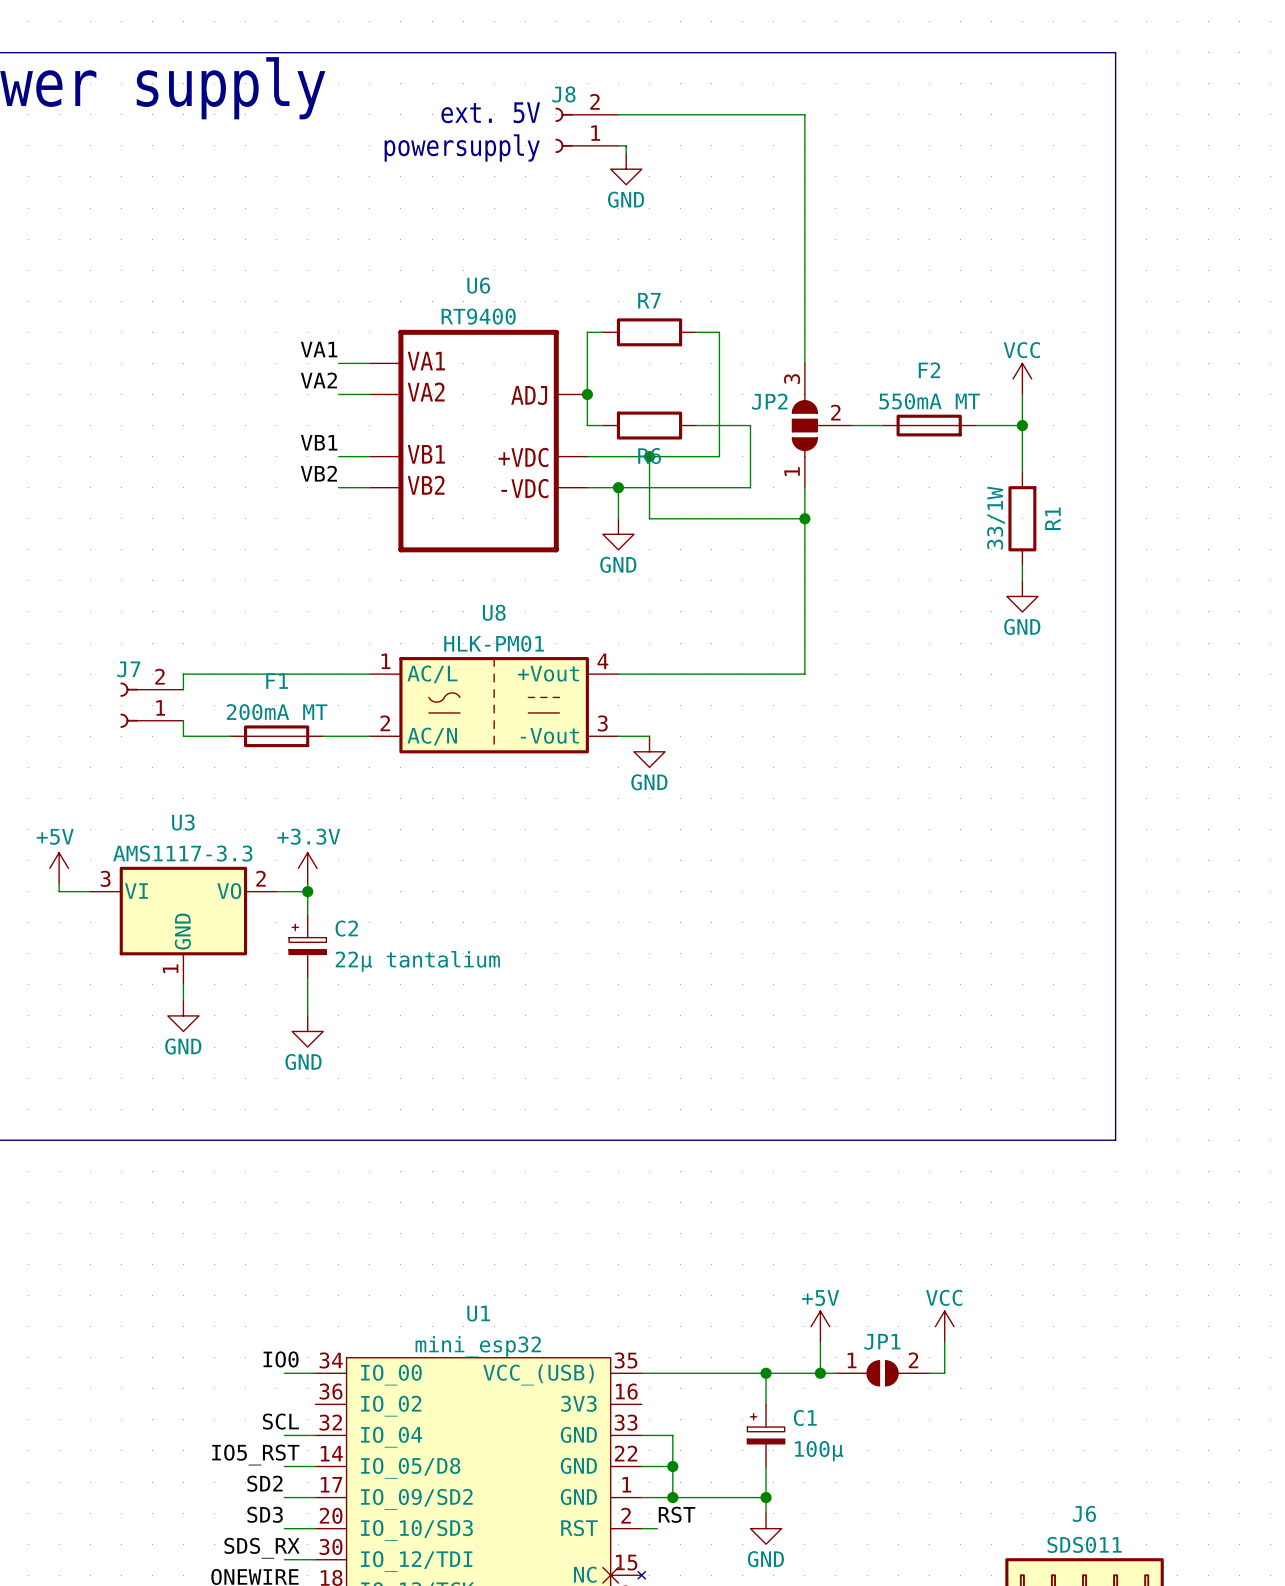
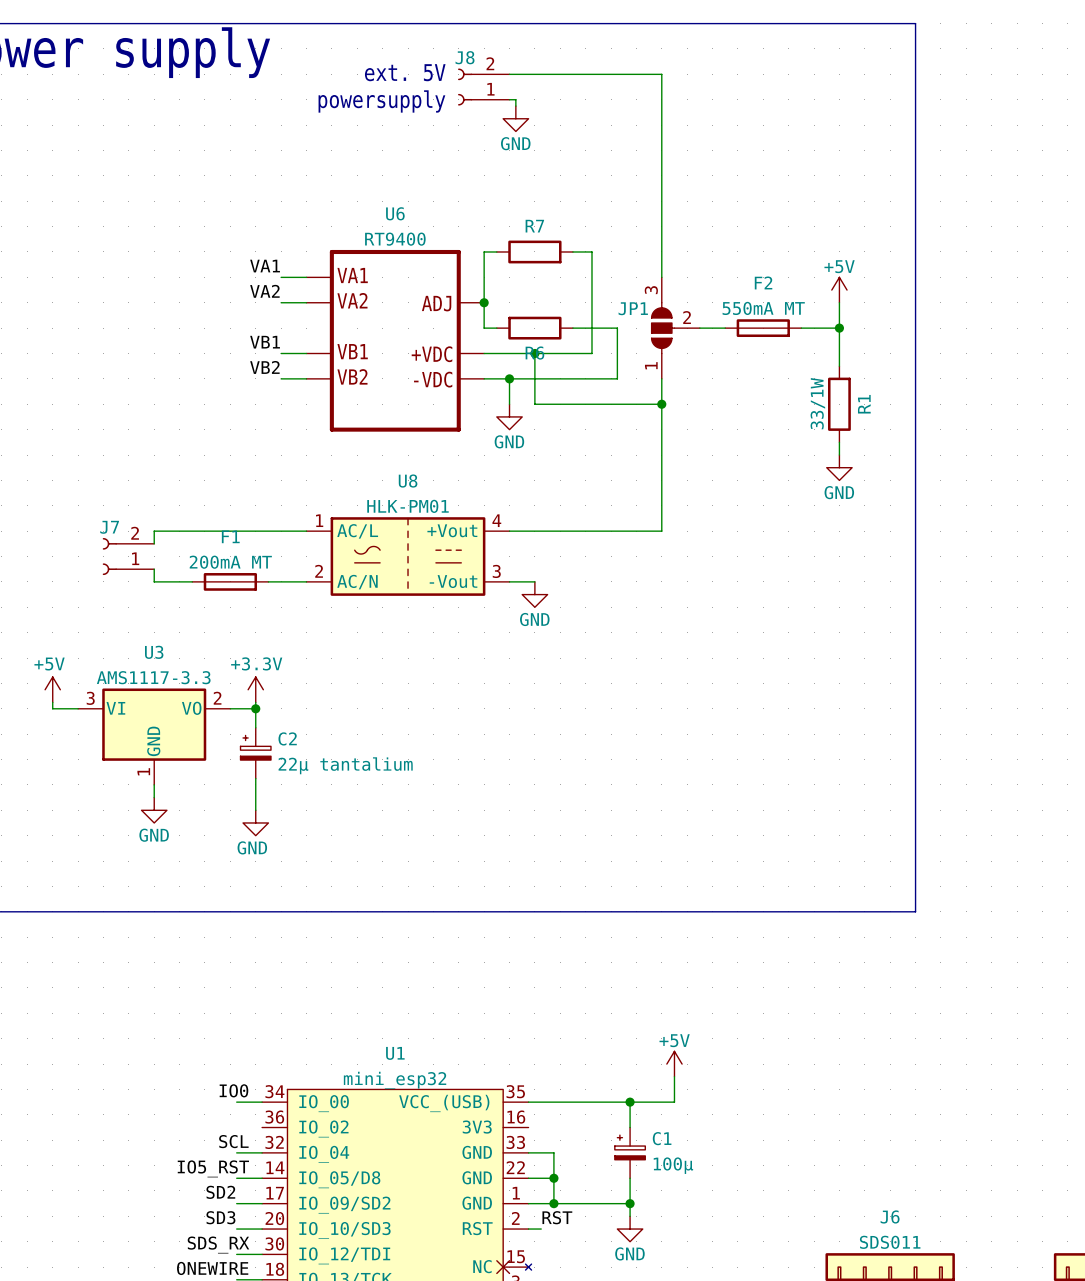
power symbol: VCC (1022, 378) -> +5V (839, 290)
JP2 name: JP2 (769, 401) -> JP1 (633, 308)
power symbol: VCC (944, 1326) -> none
wire: (944, 1342) (944, 1373) (929, 1373) -> none
wire: (820, 1373) (835, 1373) -> none
junction: (820, 1373) -> none
JP1: (882, 1373) -> none

